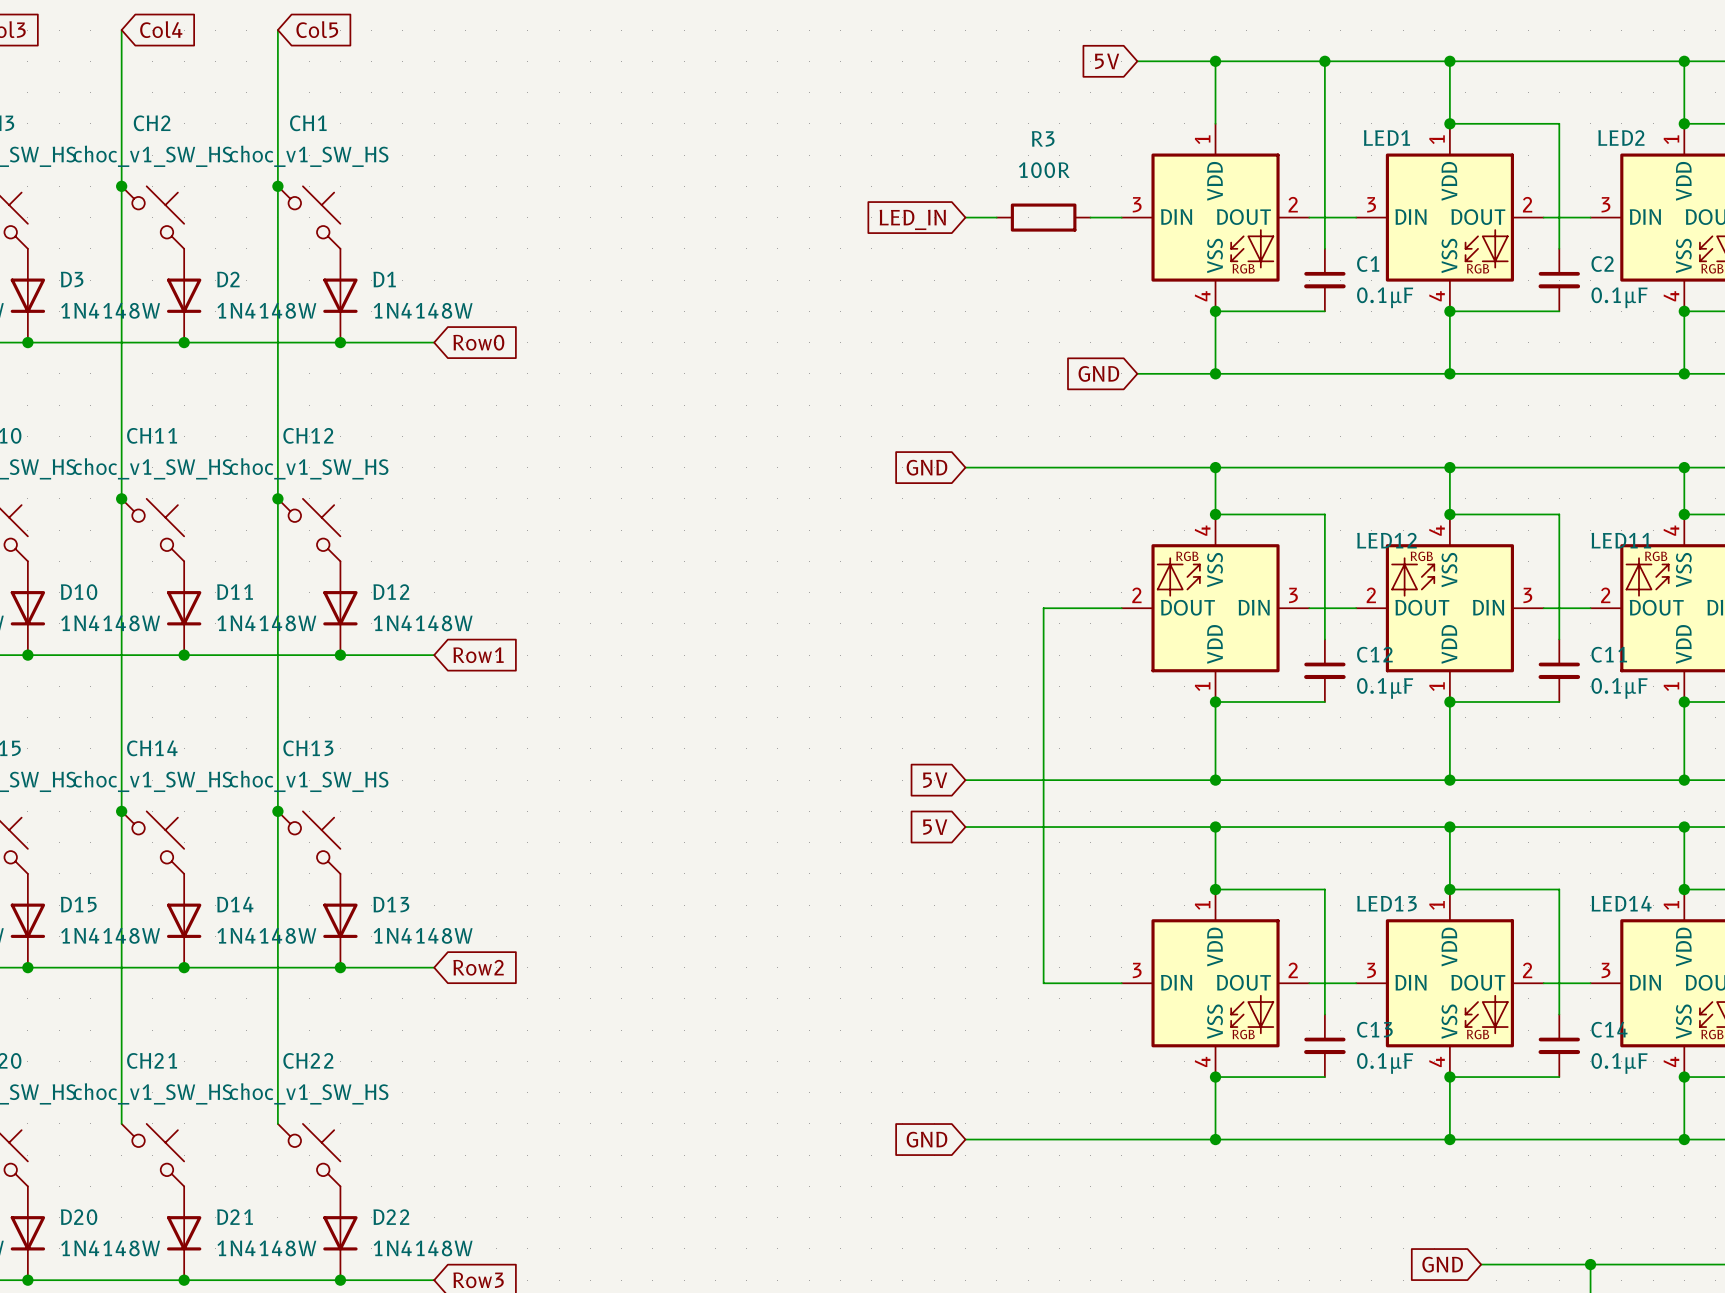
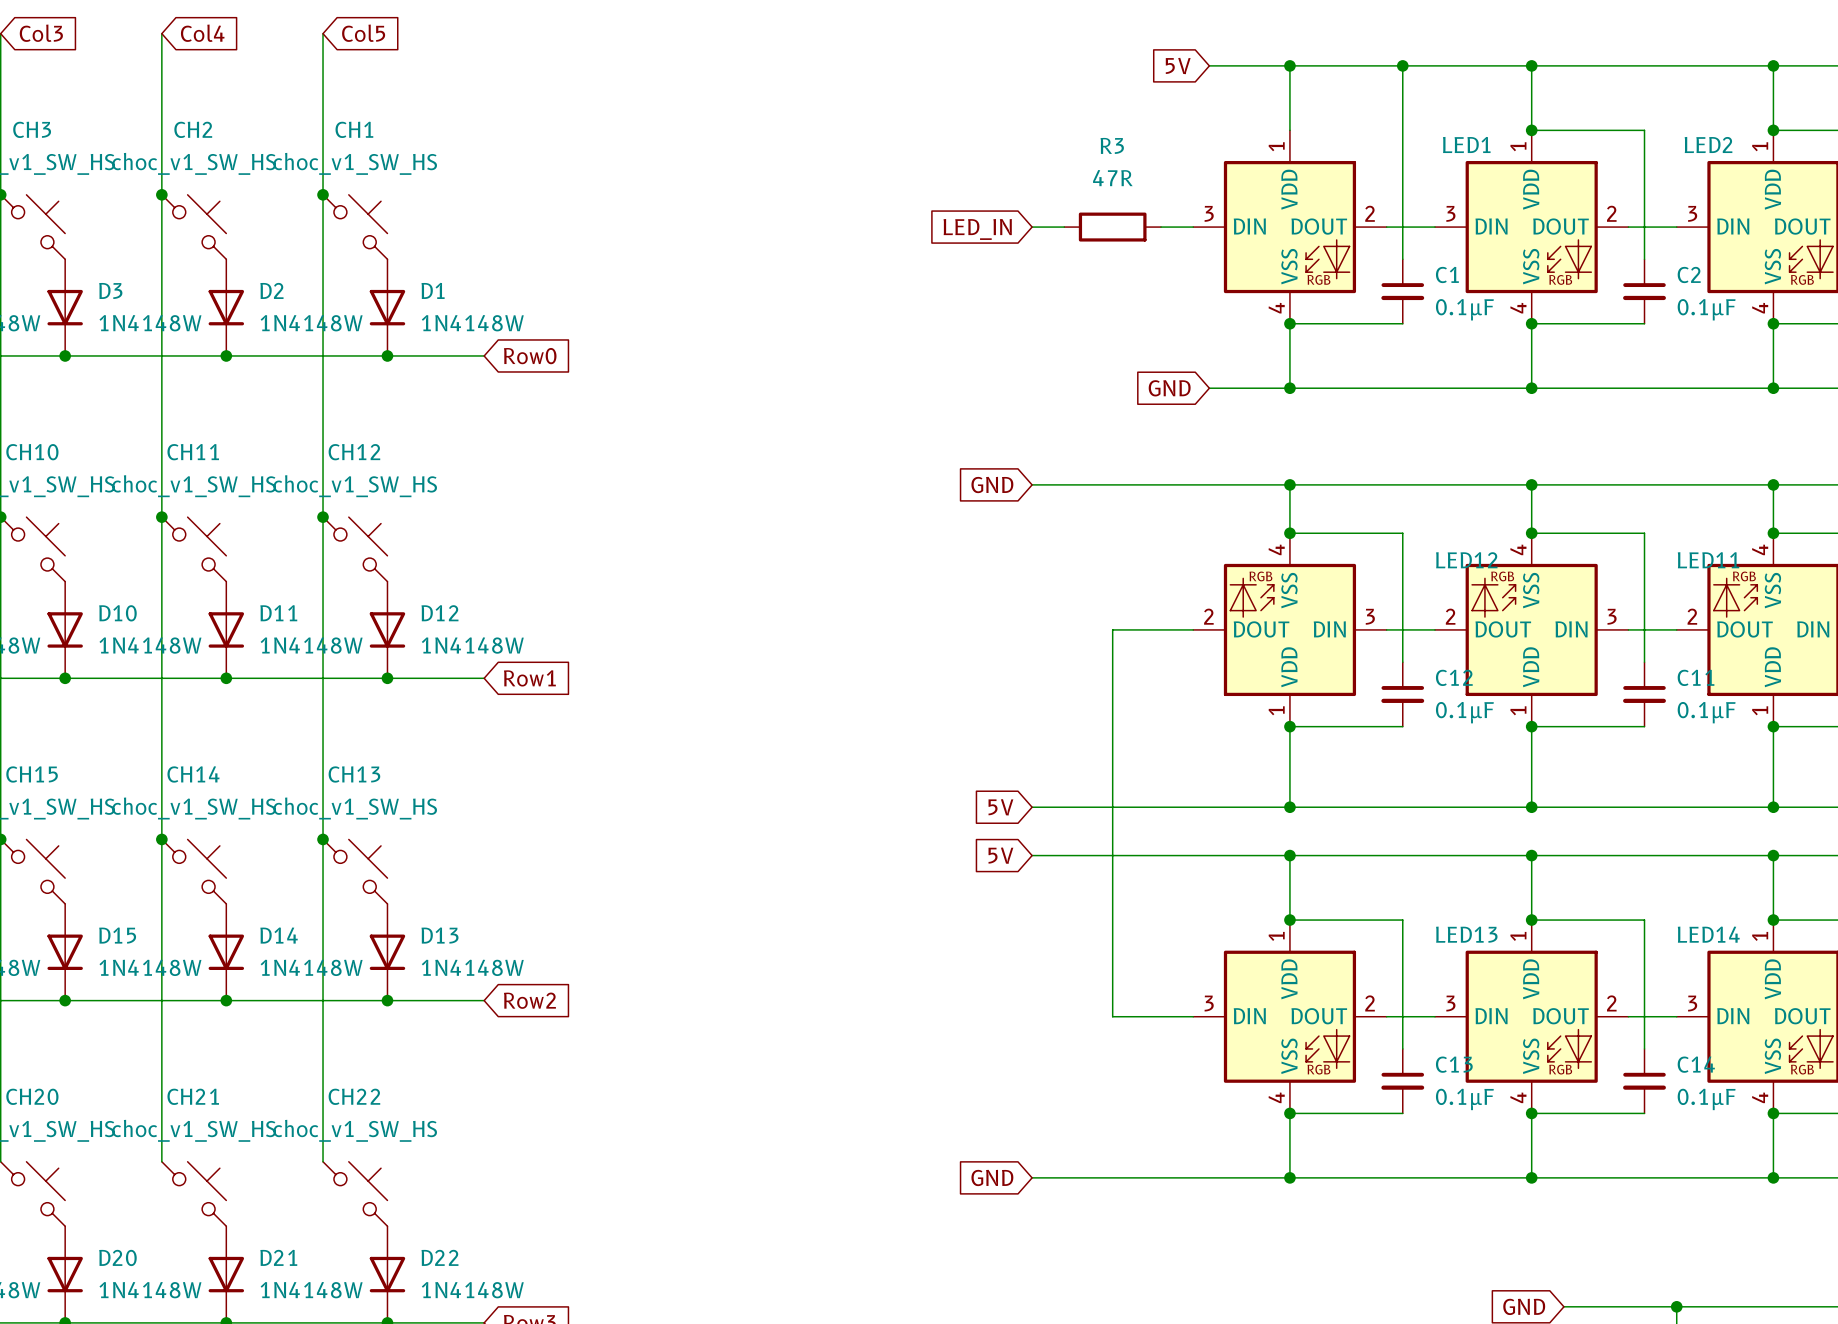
R3 value: 100R (1044, 170) -> 47R (1112, 178)

